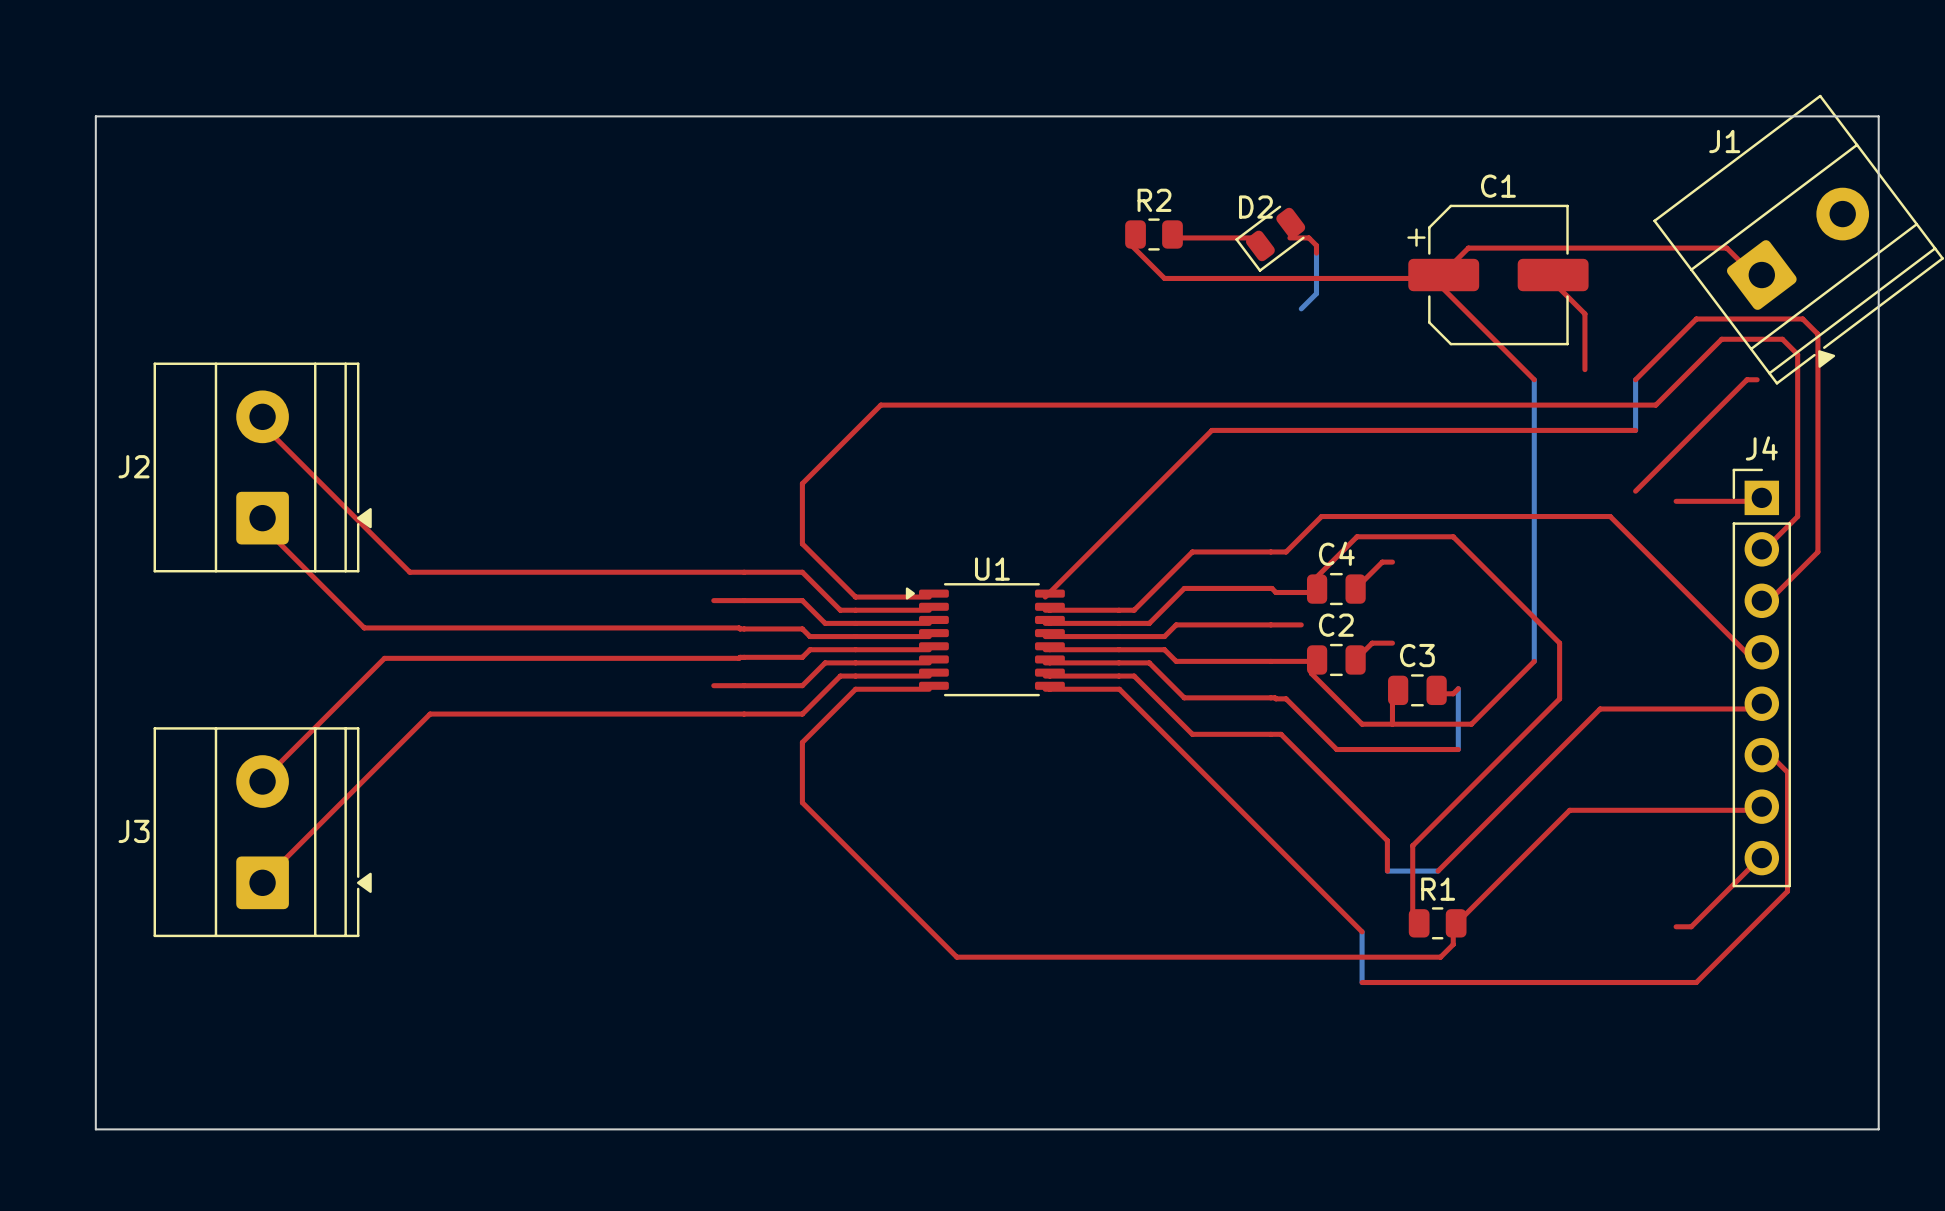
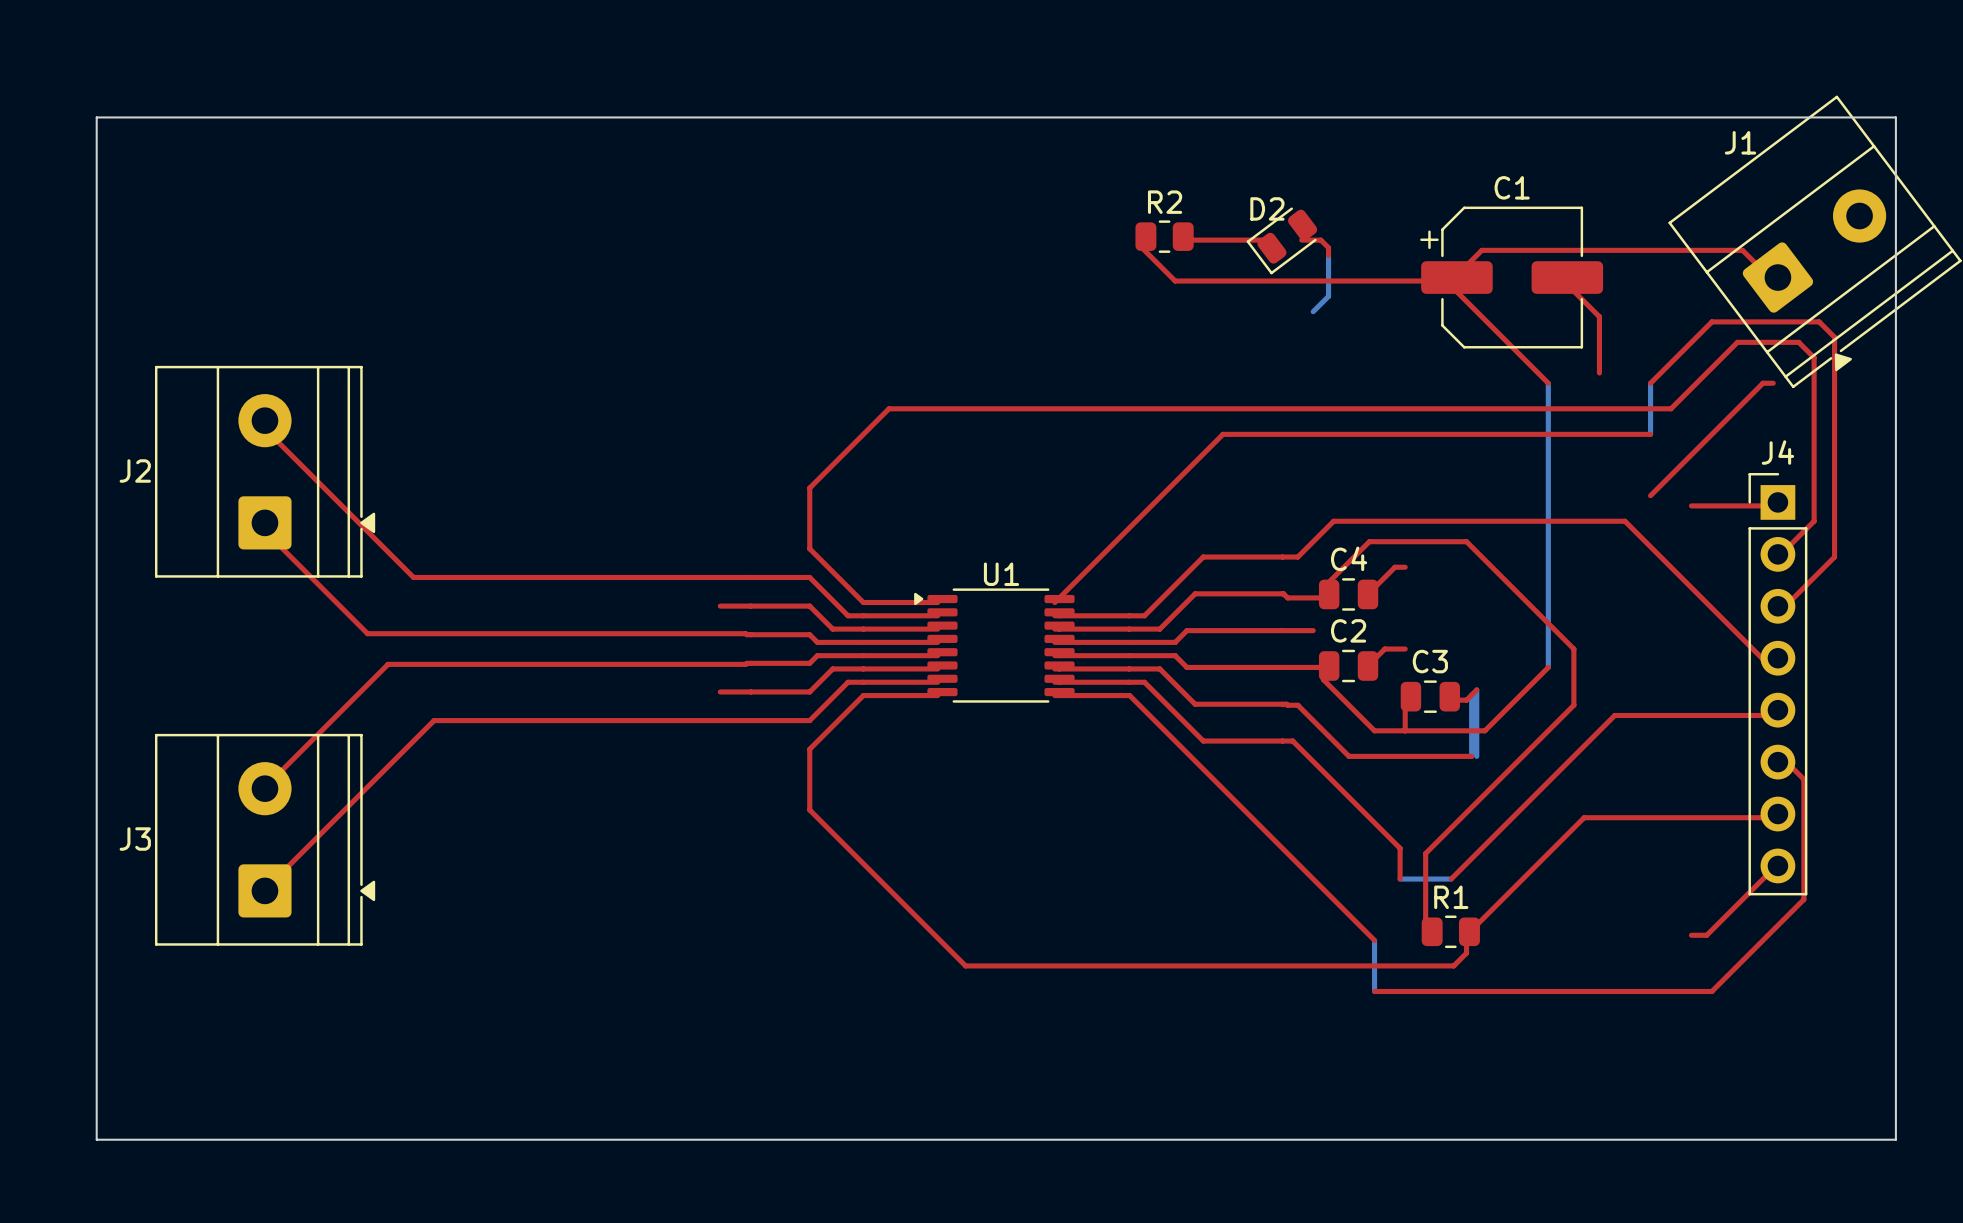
top track: none -> (1476, 689) (1471, 695)
bottom track: none -> (1476, 689) (1476, 756)

